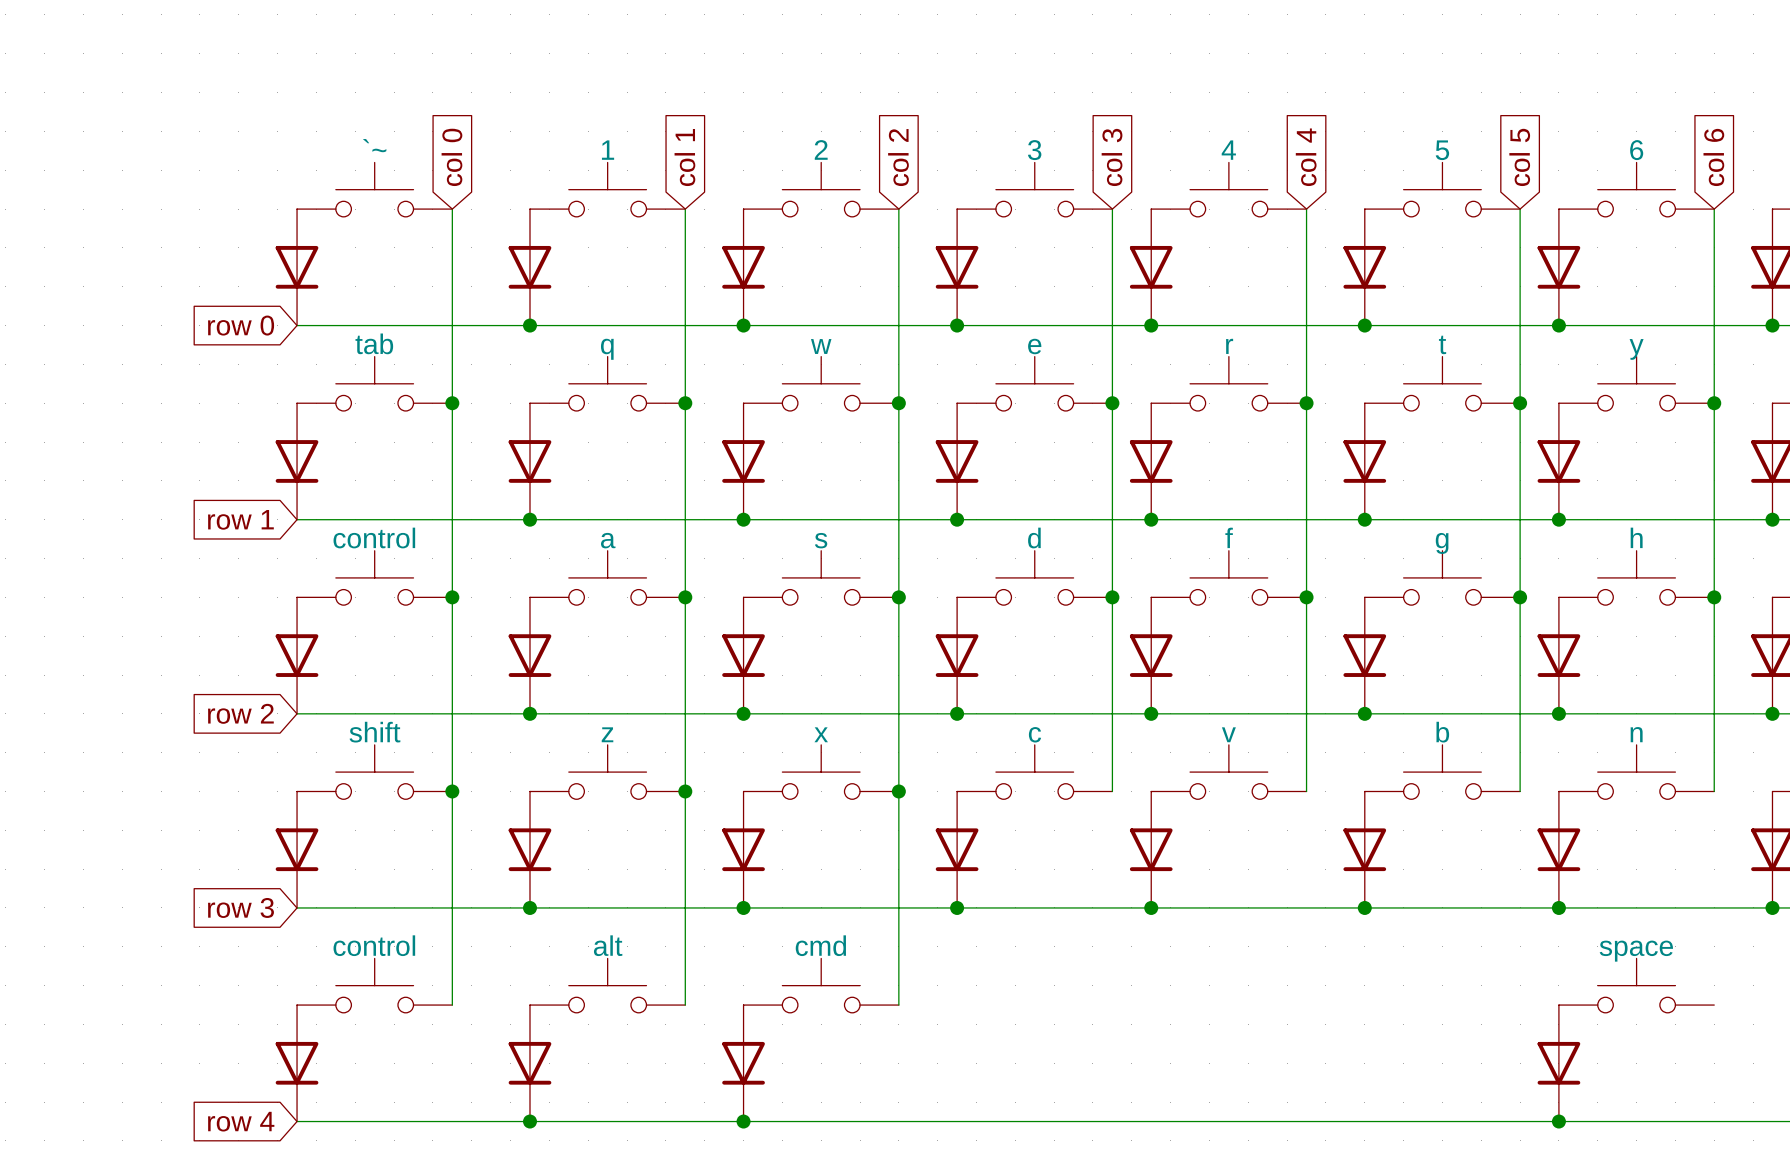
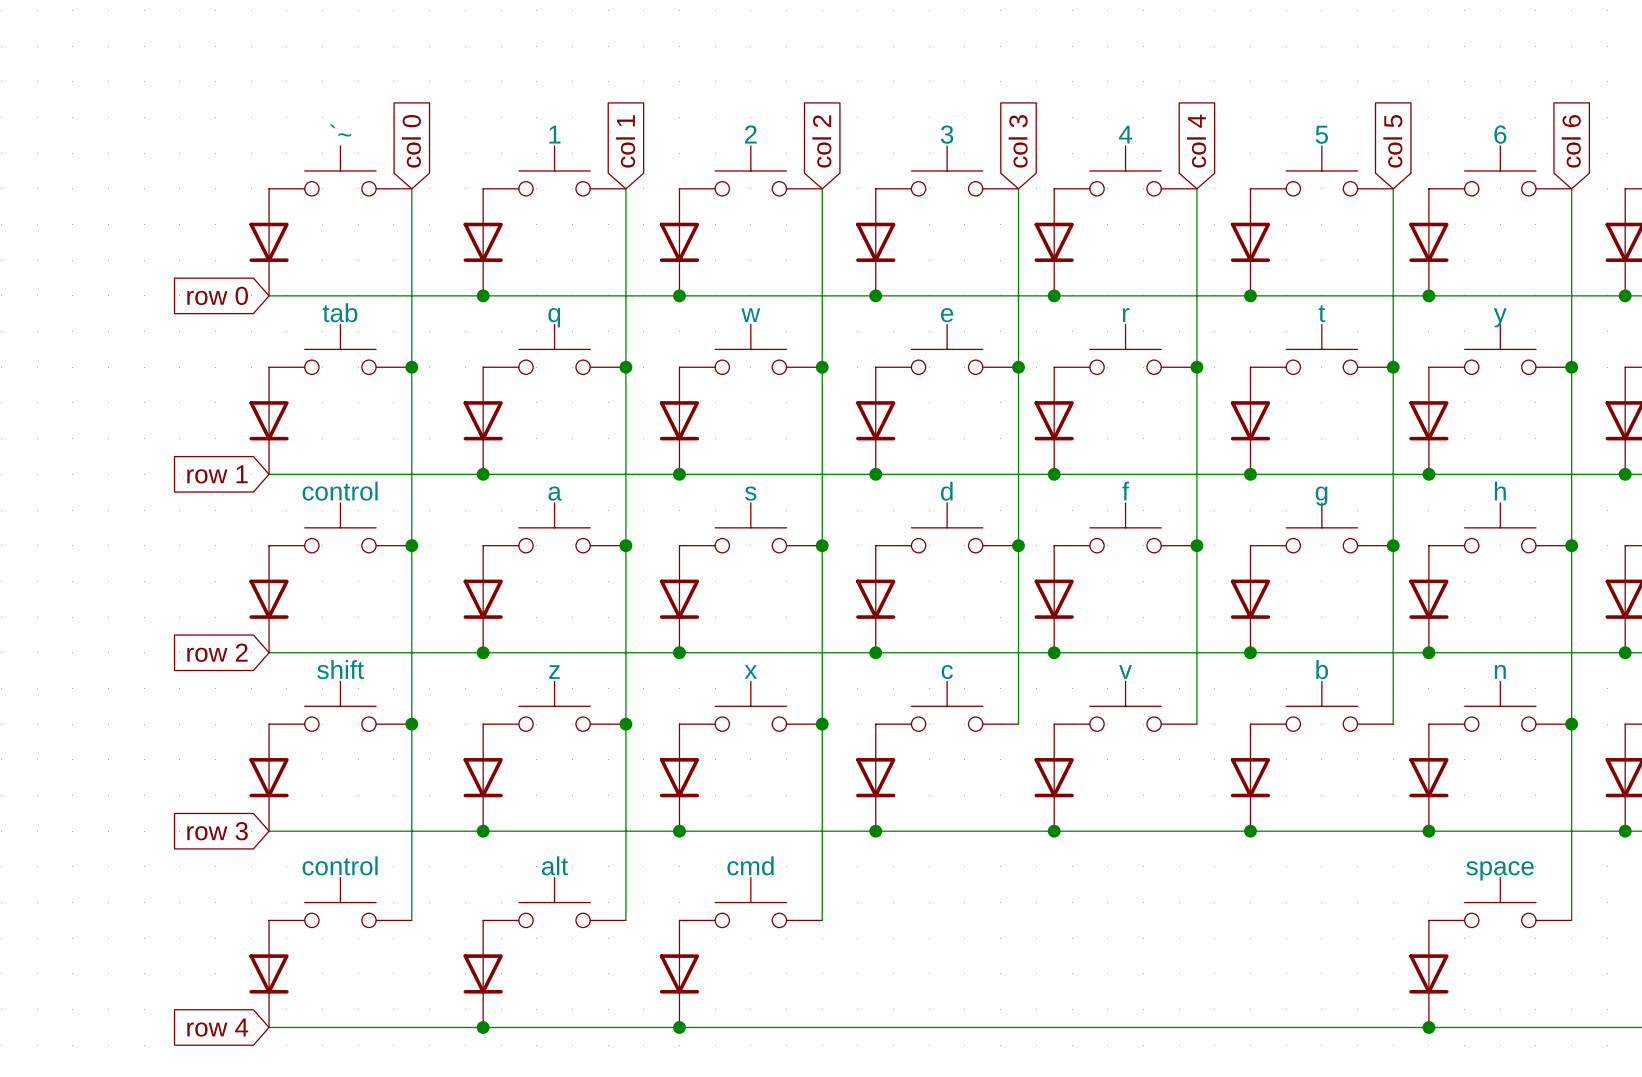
wire: none -> (1571, 724) (1571, 920)
junction: none -> (1571, 724)

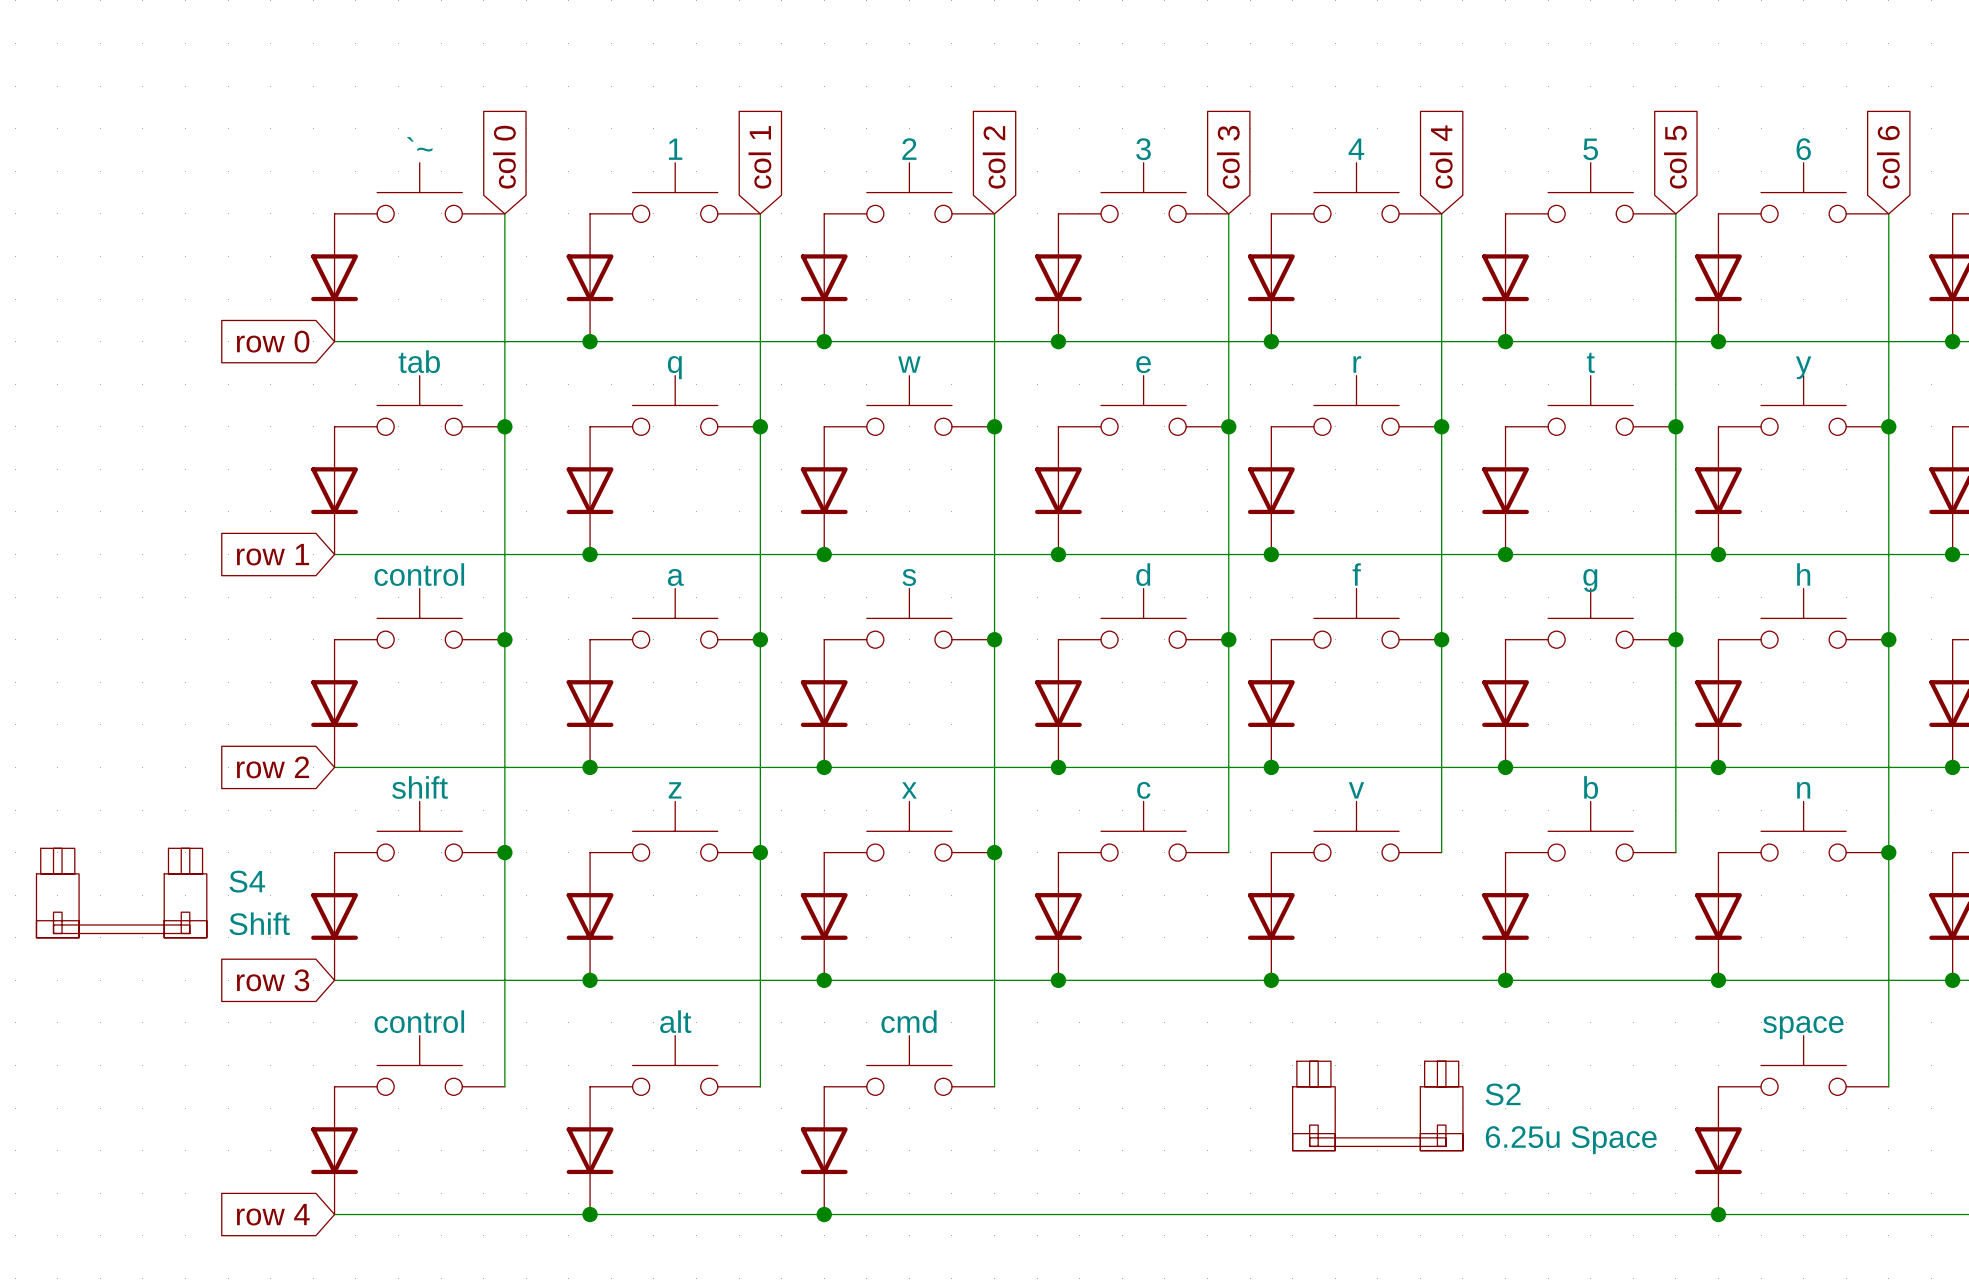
S4: none -> Shift (121, 893)
S2: none -> 6.25u Space (1377, 1105)

